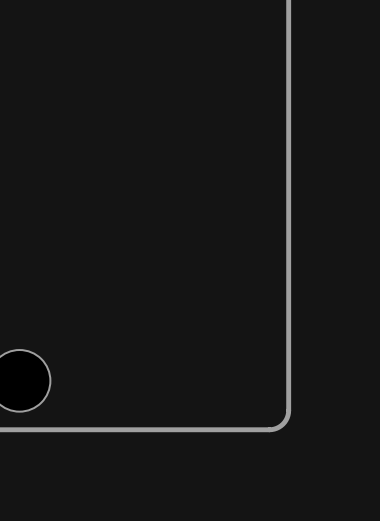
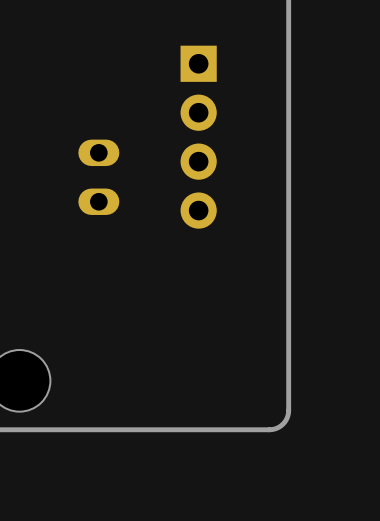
part: none -> (198, 137)
part: none -> (98, 177)

